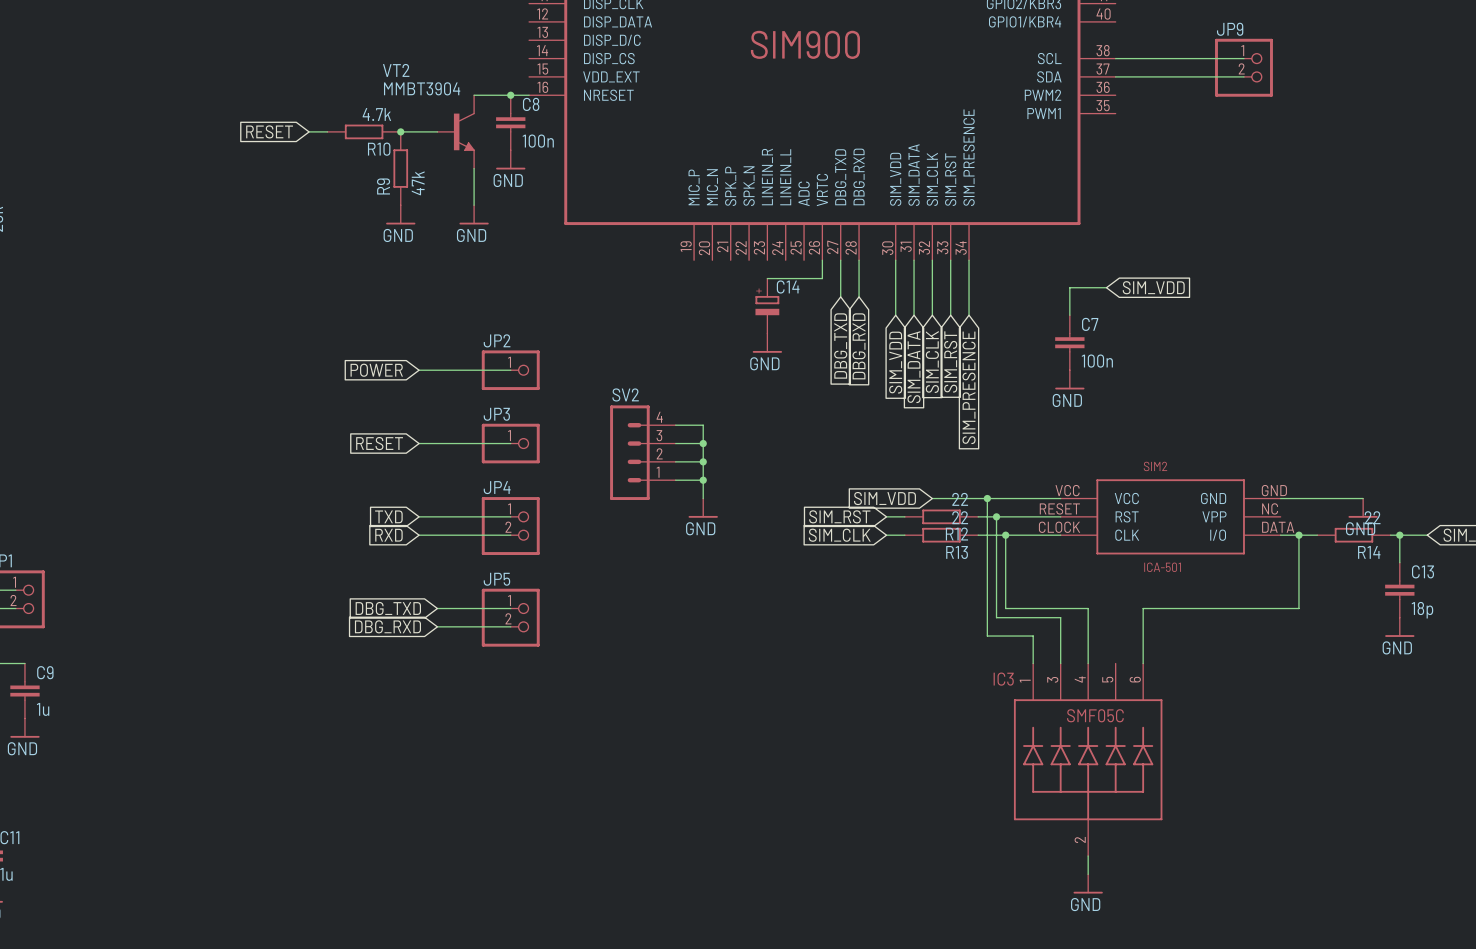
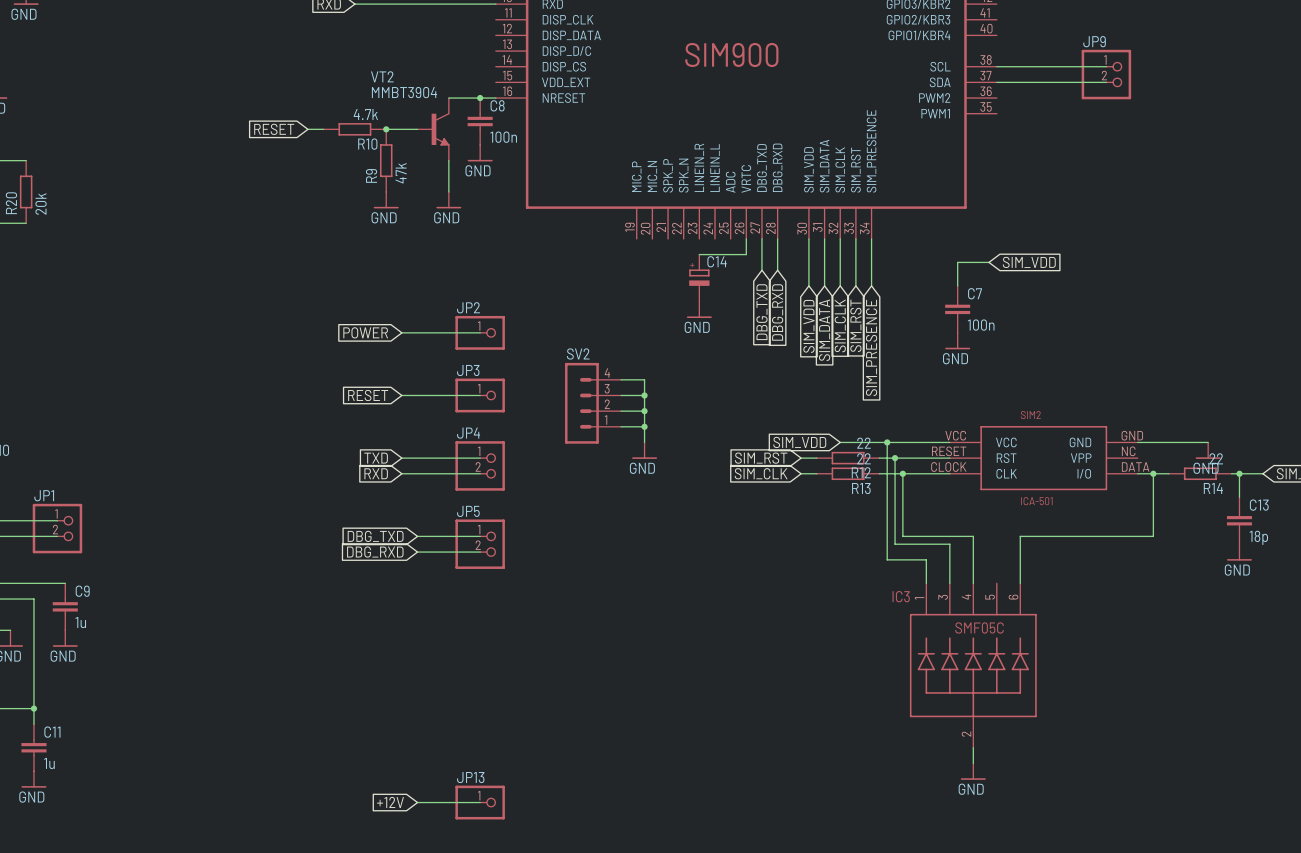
global label: none -> +12V (390, 802)
wire: none -> (417, 802) (480, 802)
JP13: none -> (480, 802)

